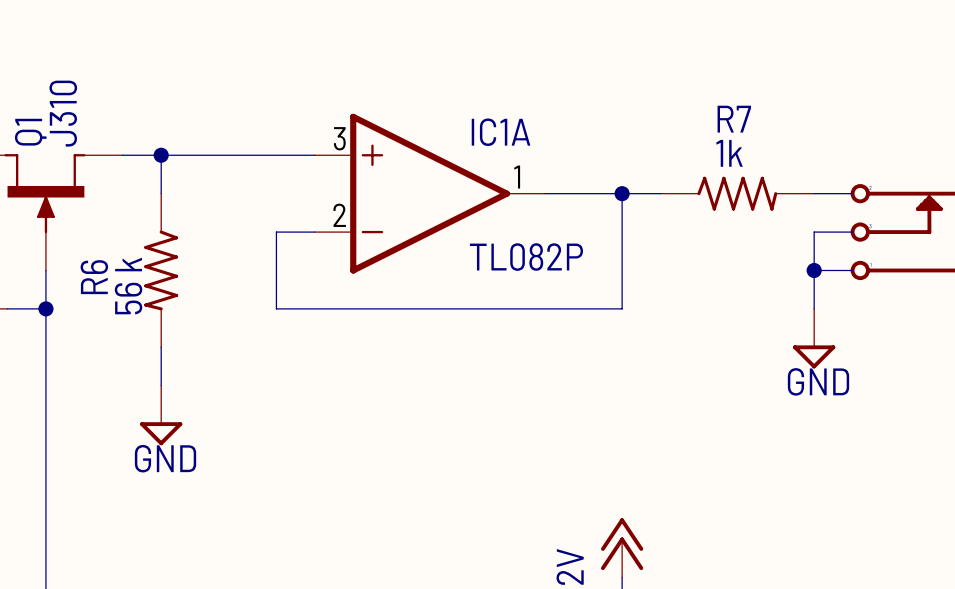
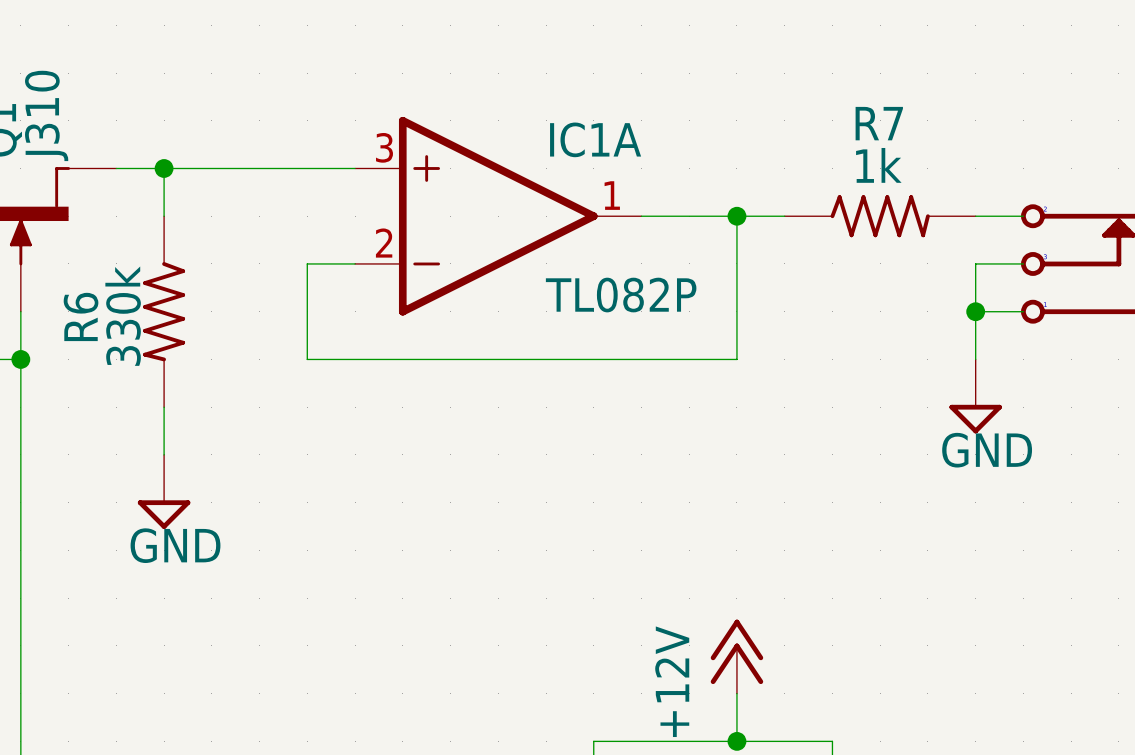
R6 value: 56 k (128, 286) -> 330k (123, 316)

